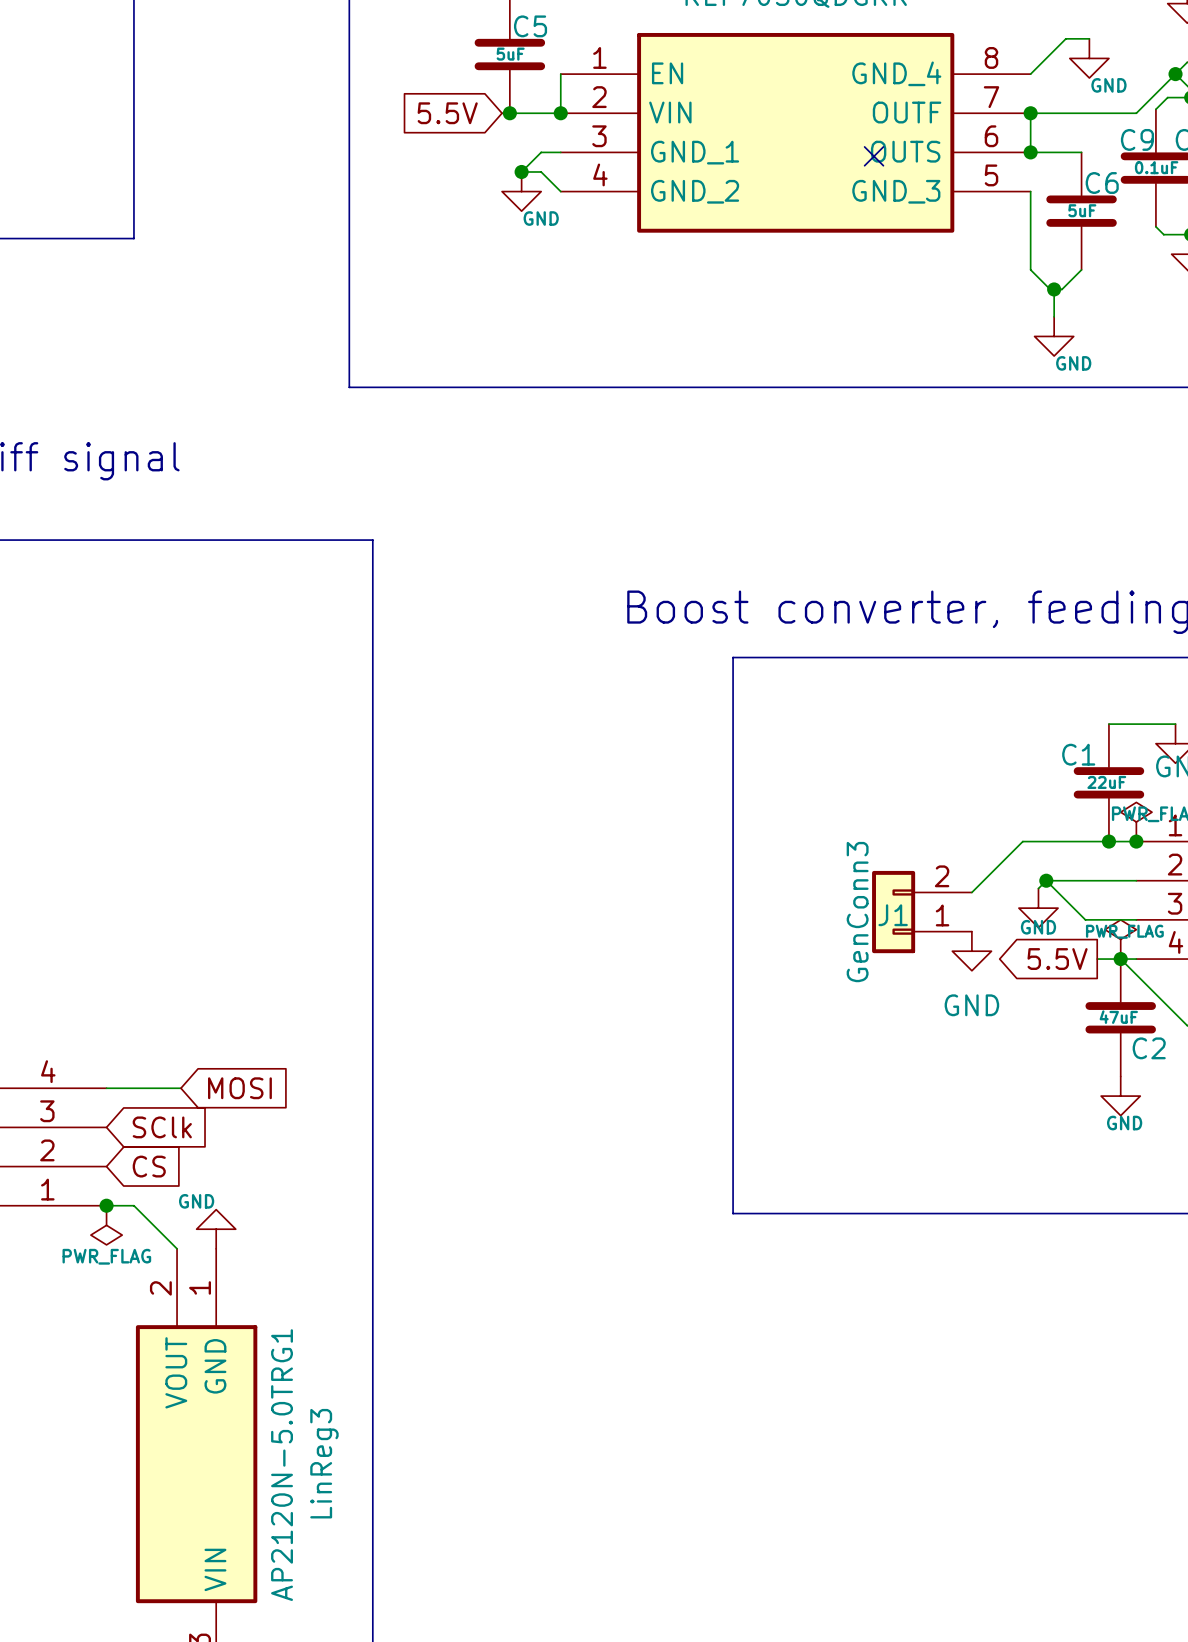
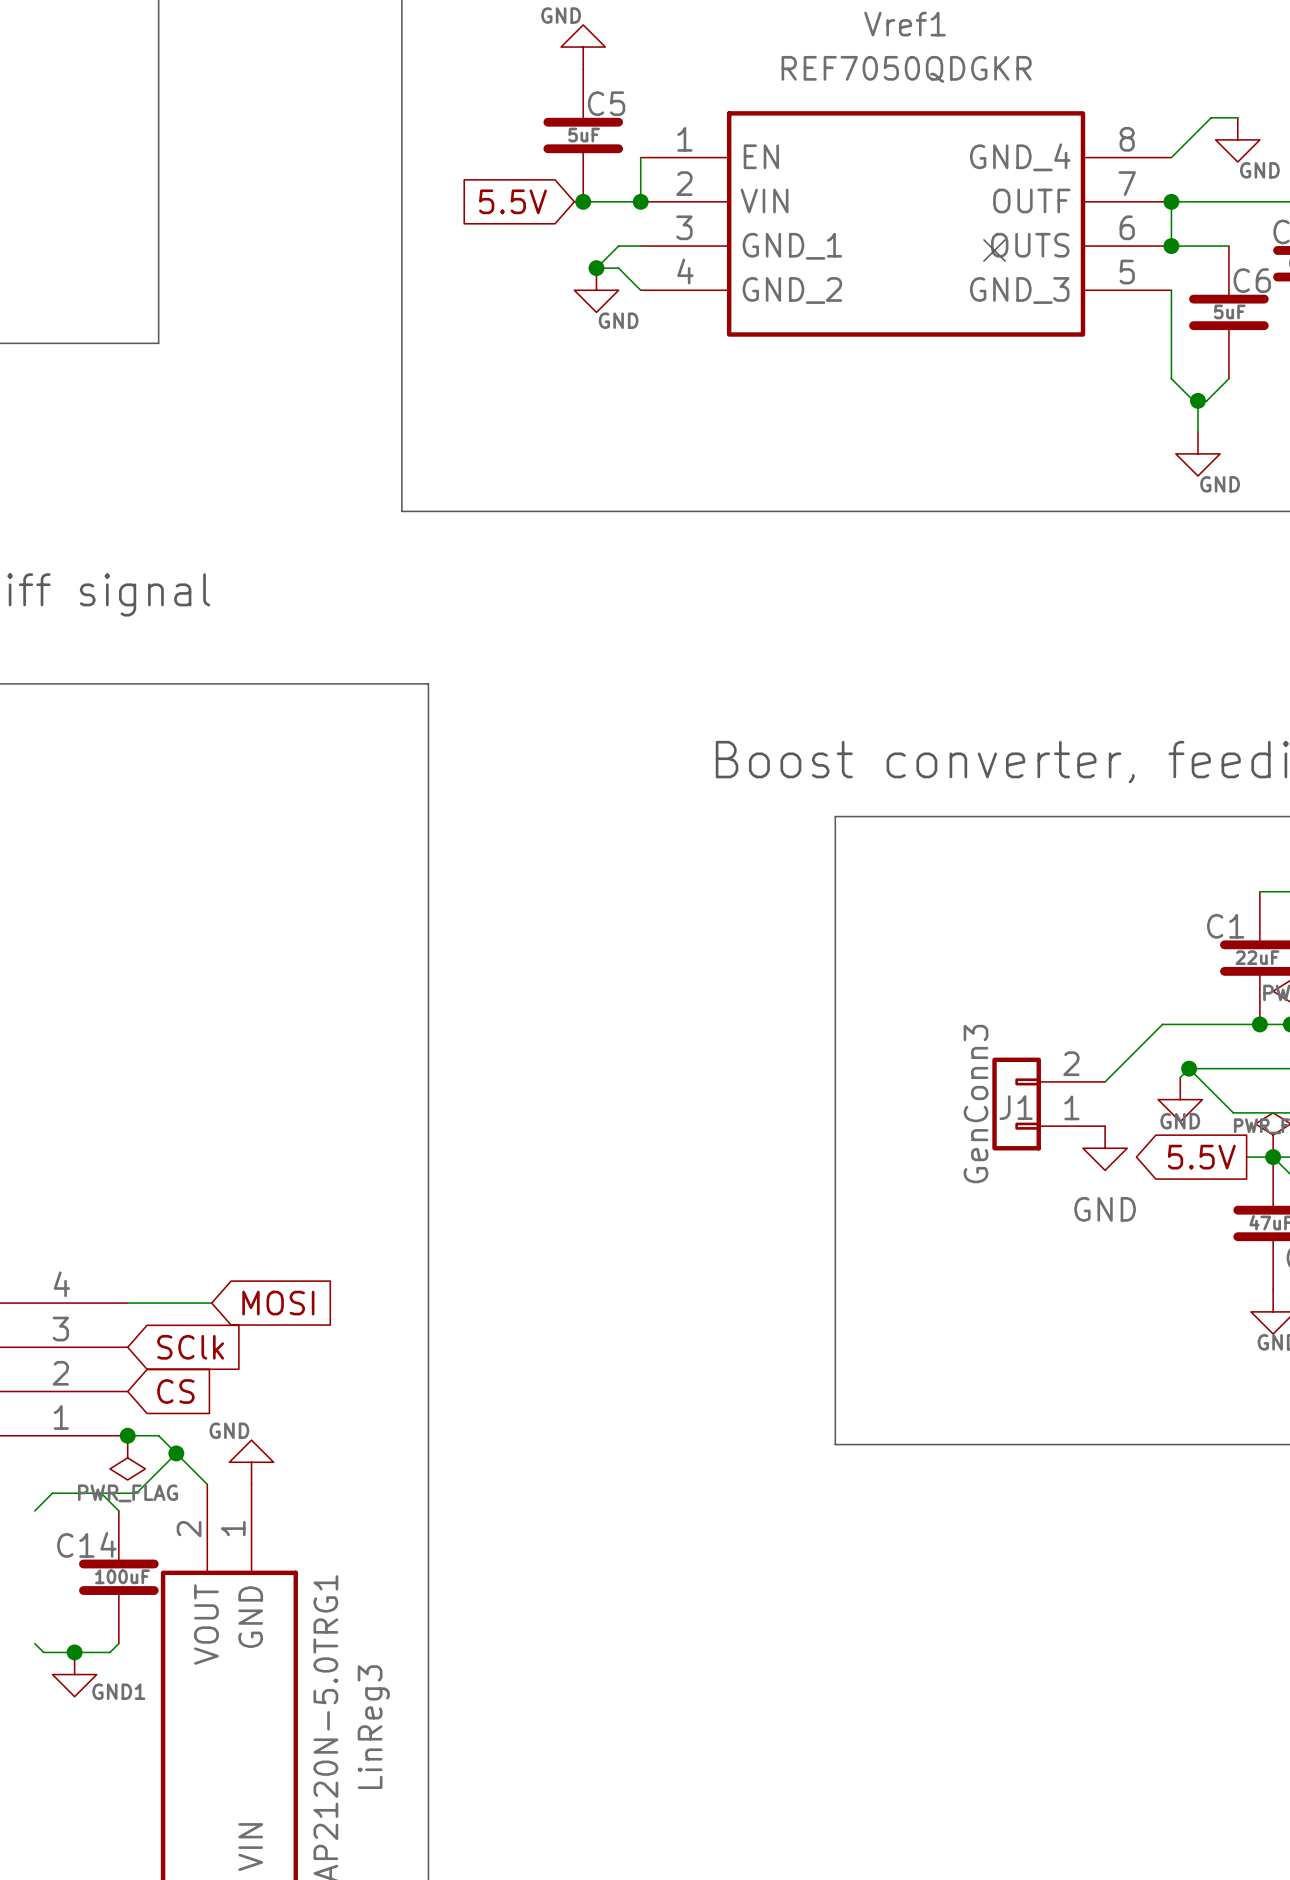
wire: none -> (176, 1453) (136, 1493) (52, 1493) (34, 1510)
junction: none -> (176, 1453)
wire: none -> (101, 1493) (118, 1510)
C14: none -> 100uF (118, 1577)
wire: none -> (34, 1643) (43, 1652) (110, 1652) (118, 1643)
junction: none -> (74, 1652)
power symbol: none -> GND1 (74, 1674)

